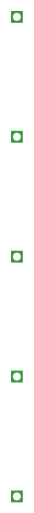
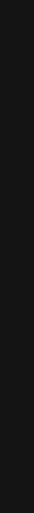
part: (16, 16) -> none
part: (16, 136) -> none
part: (16, 256) -> none
part: (16, 376) -> none
part: (16, 496) -> none

